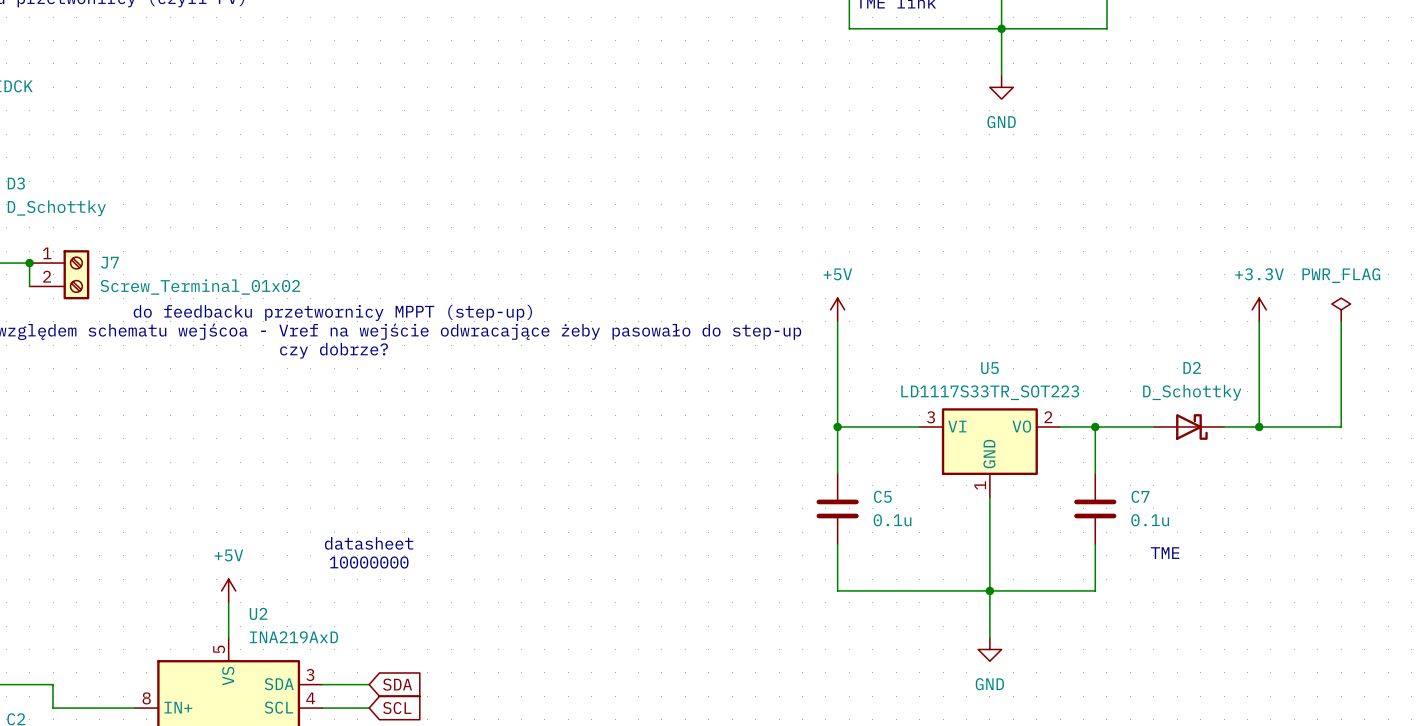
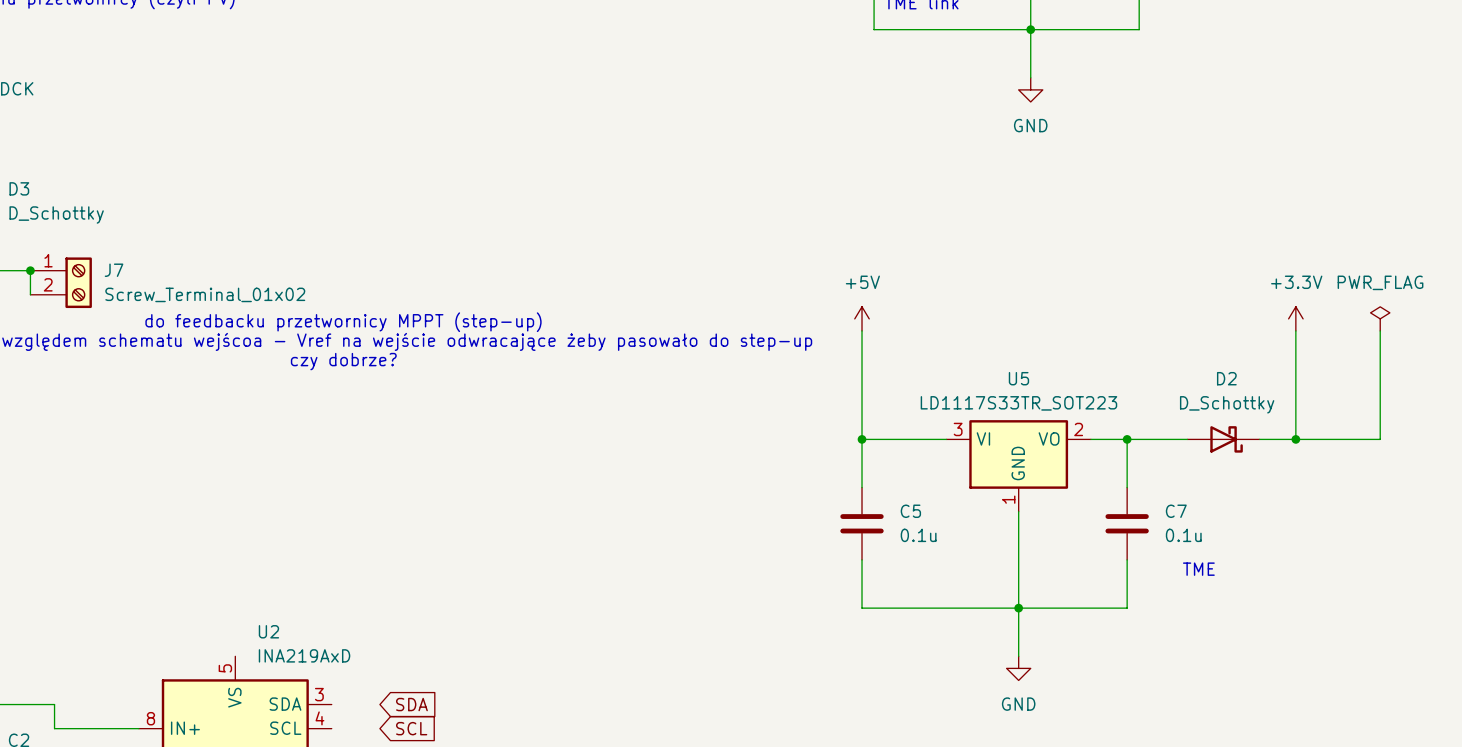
text: datasheet (369, 543) -> none
text: 10000000 (369, 562) -> none
power symbol: +5V (228, 590) -> none
wire: (228, 602) (228, 637) -> none
wire: (322, 684) (369, 684) -> none
wire: (322, 708) (369, 708) -> none

